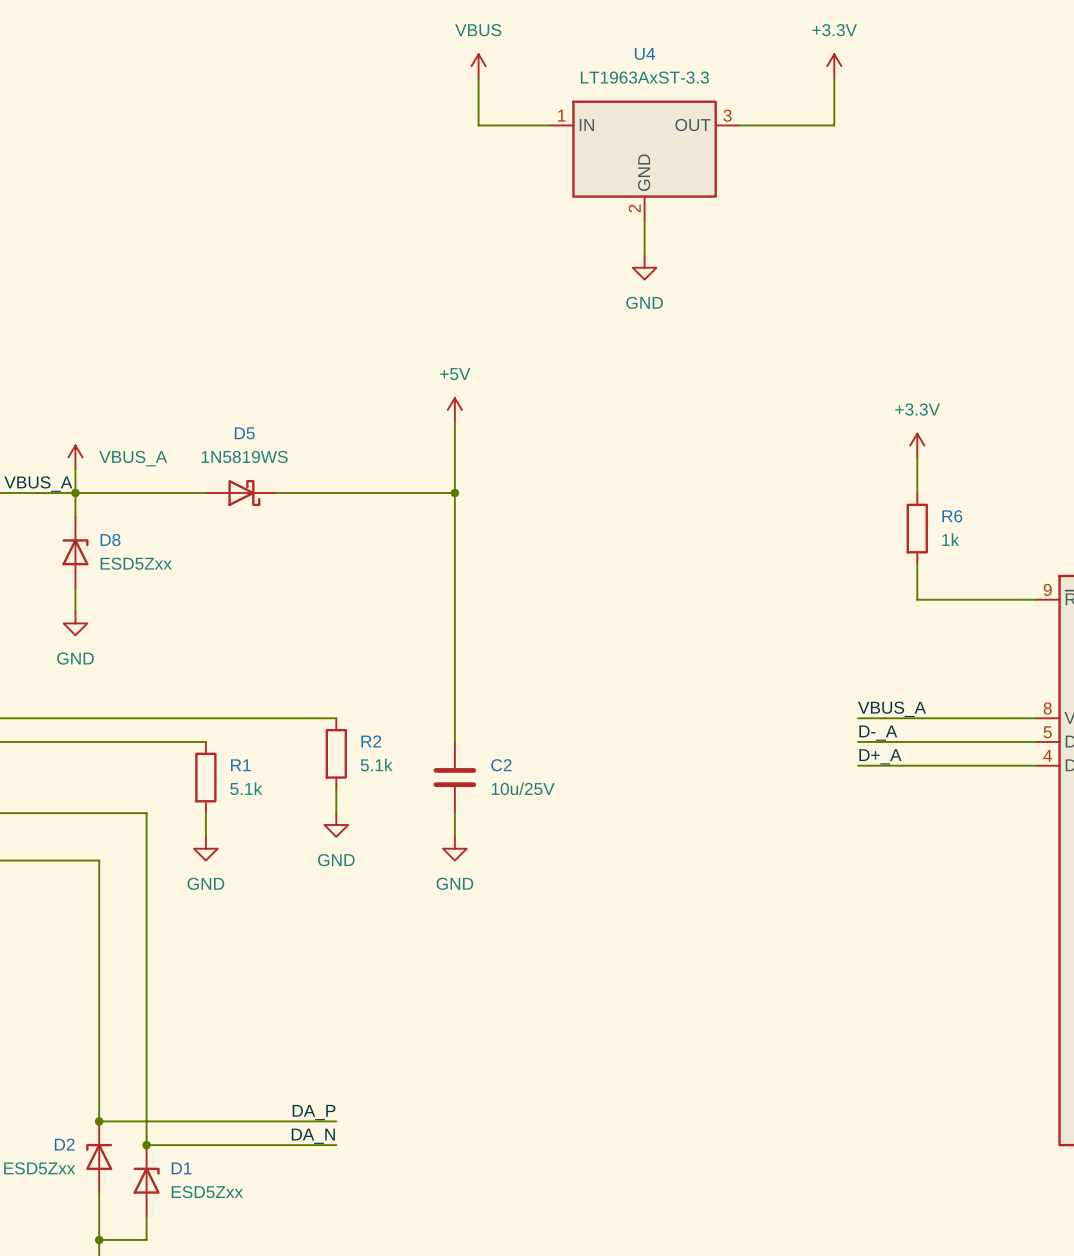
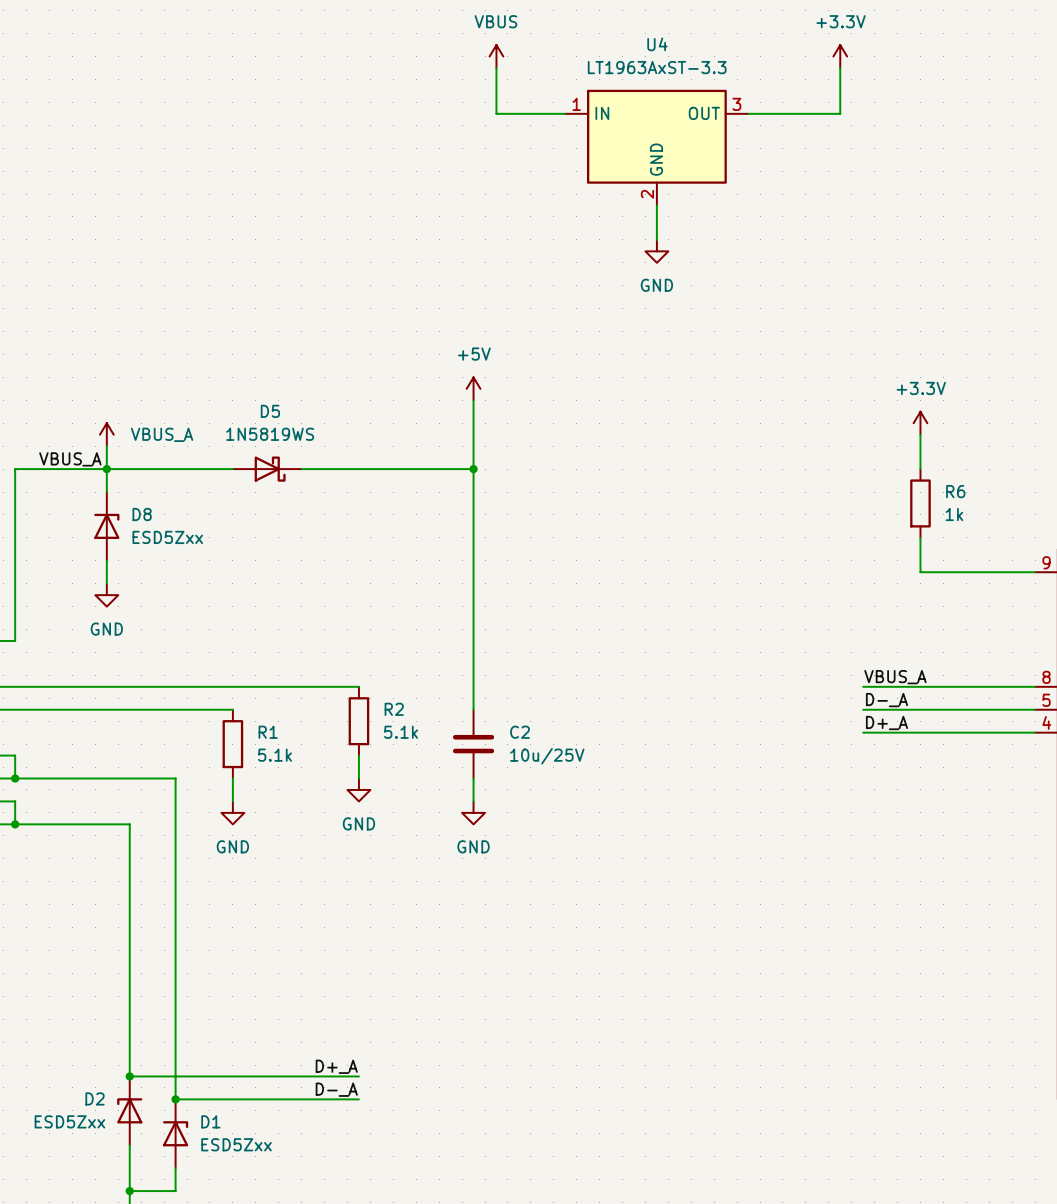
label: DA_P (314, 1112) -> D+_A (336, 1066)
label: DA_N (313, 1136) -> D-_A (336, 1089)

